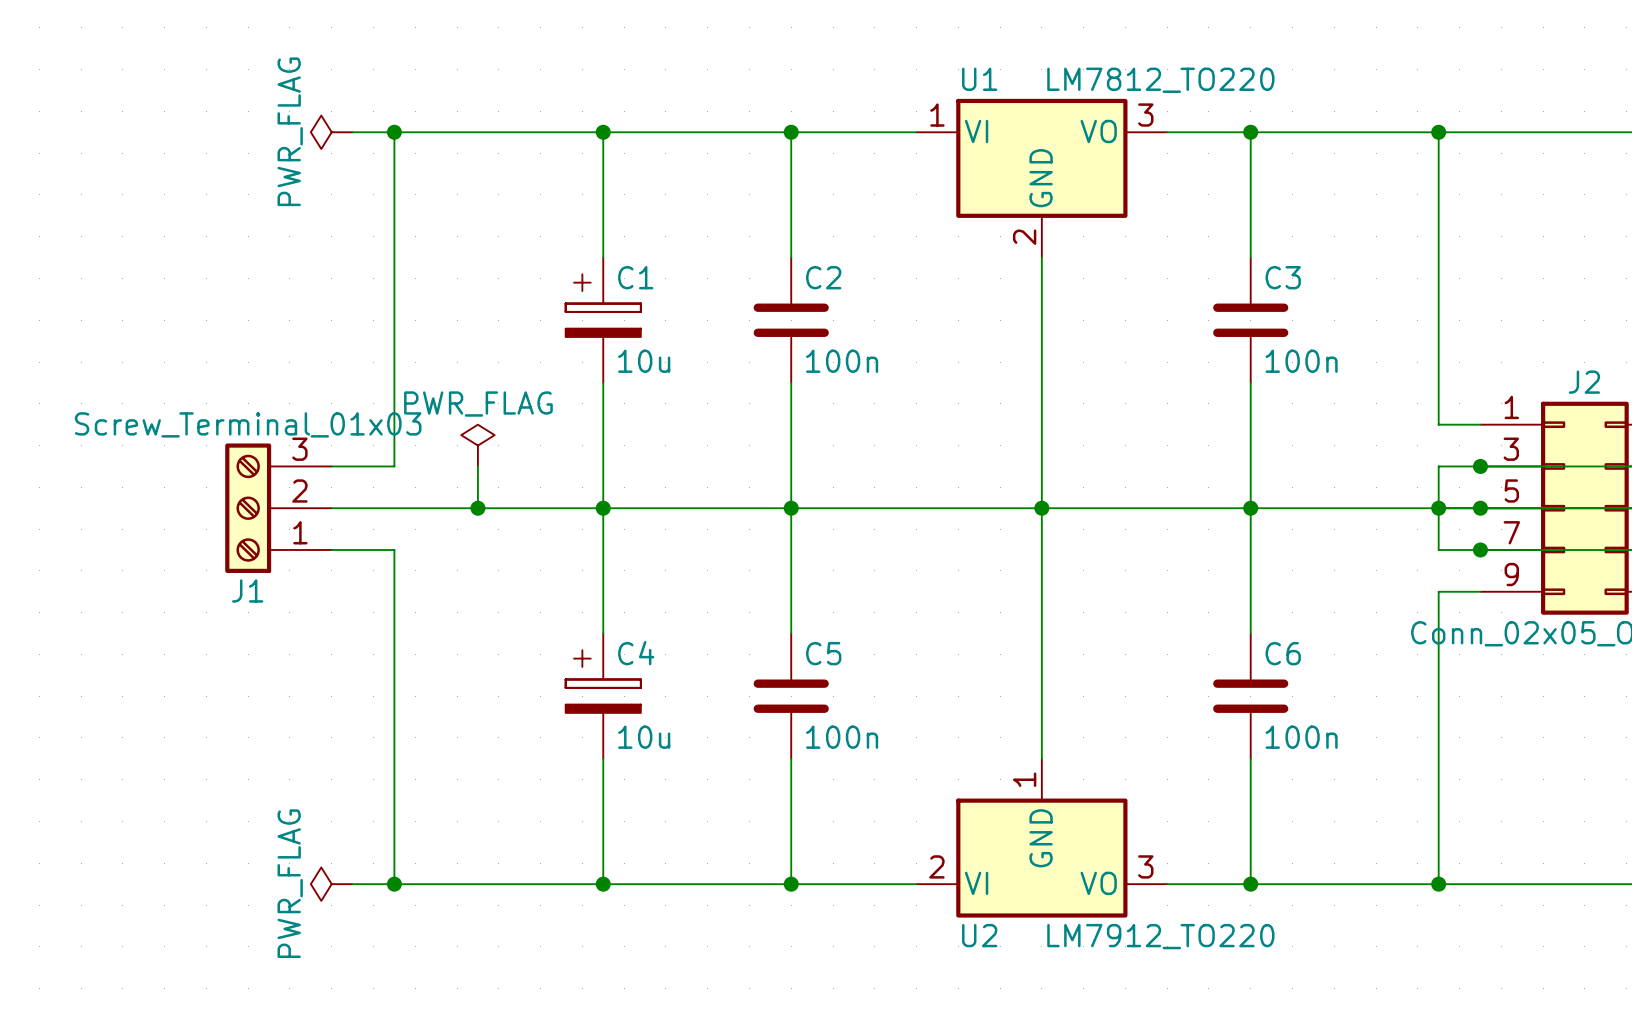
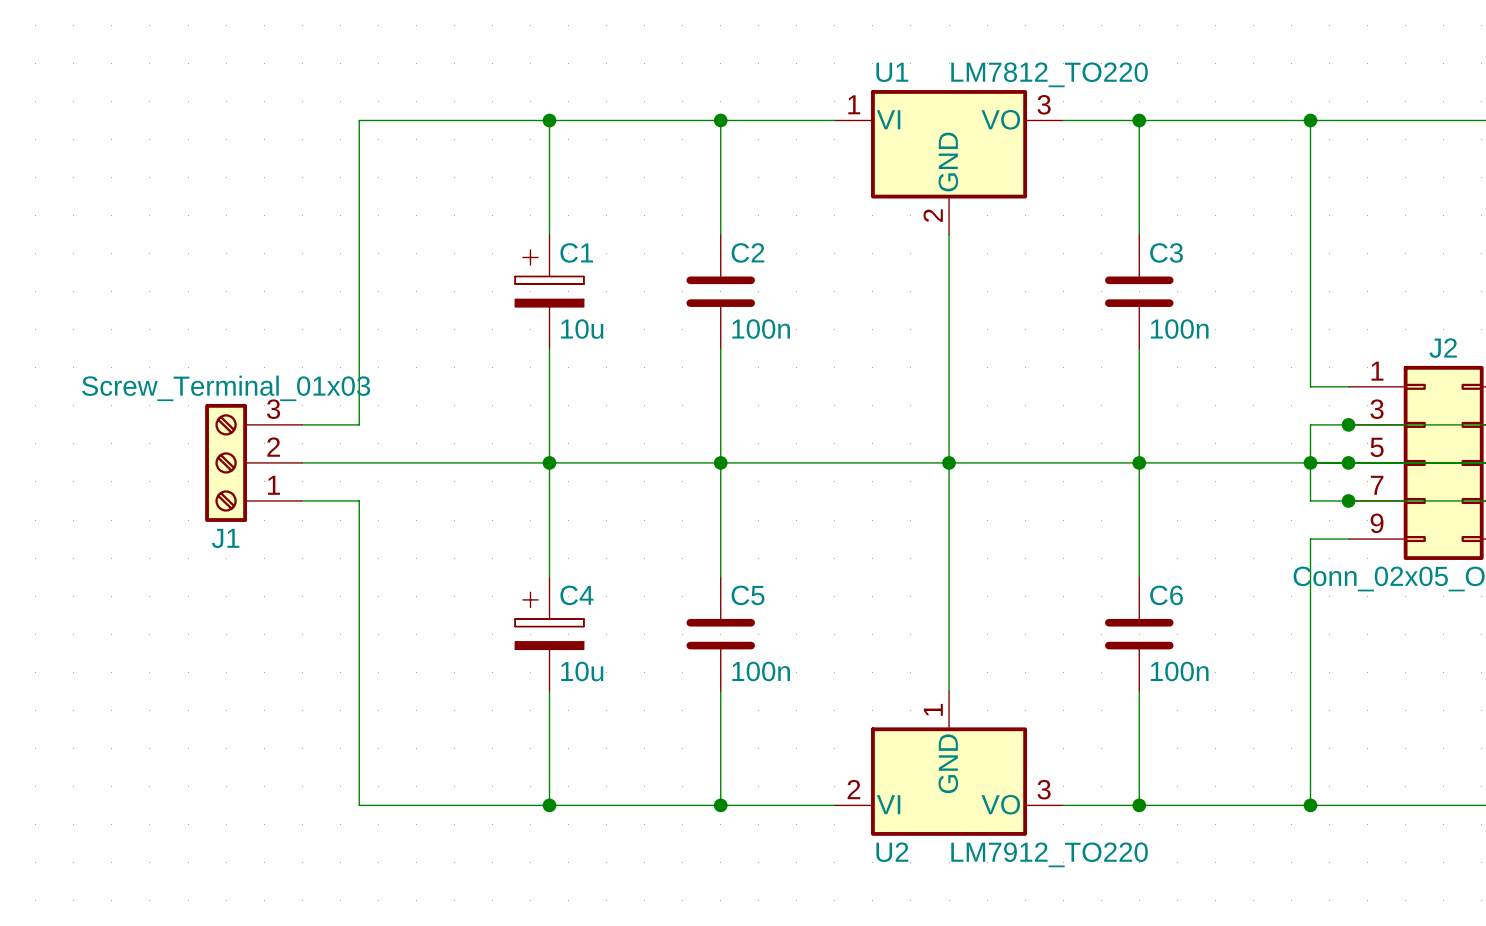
power symbol: PWR_FLAG (331, 132) -> none
wire: (352, 132) (394, 132) -> none
junction: (394, 132) -> none
power symbol: PWR_FLAG (477, 445) -> none
wire: (477, 466) (477, 508) -> none
junction: (477, 508) -> none
power symbol: PWR_FLAG (331, 884) -> none
wire: (352, 884) (394, 884) -> none
junction: (394, 884) -> none

